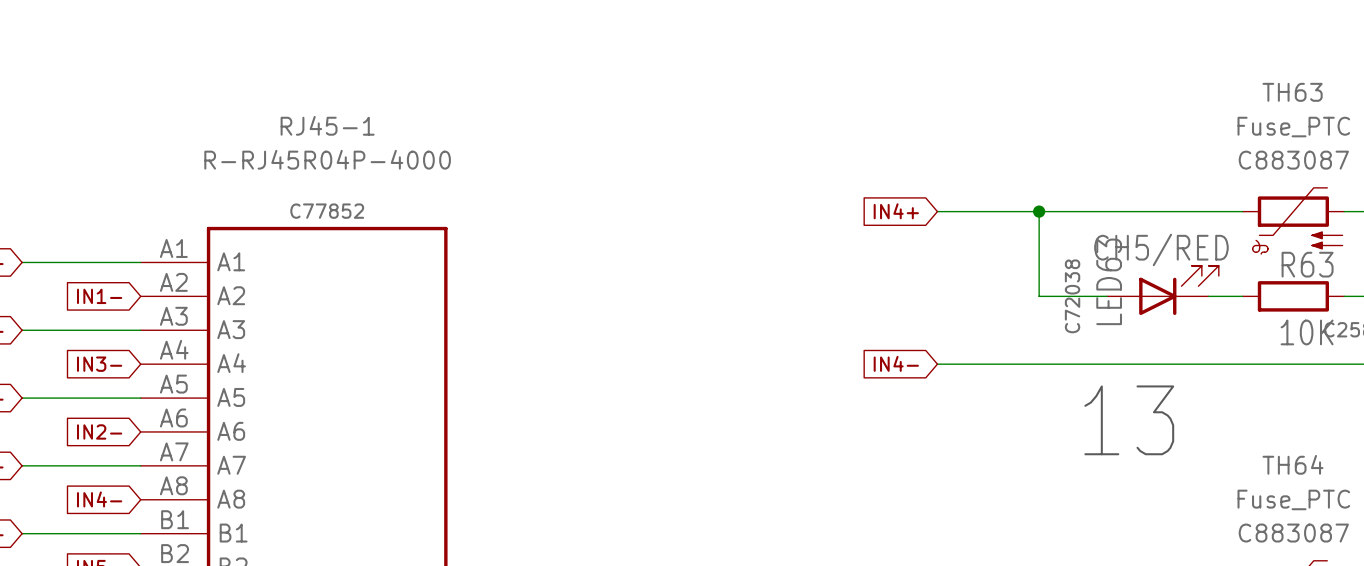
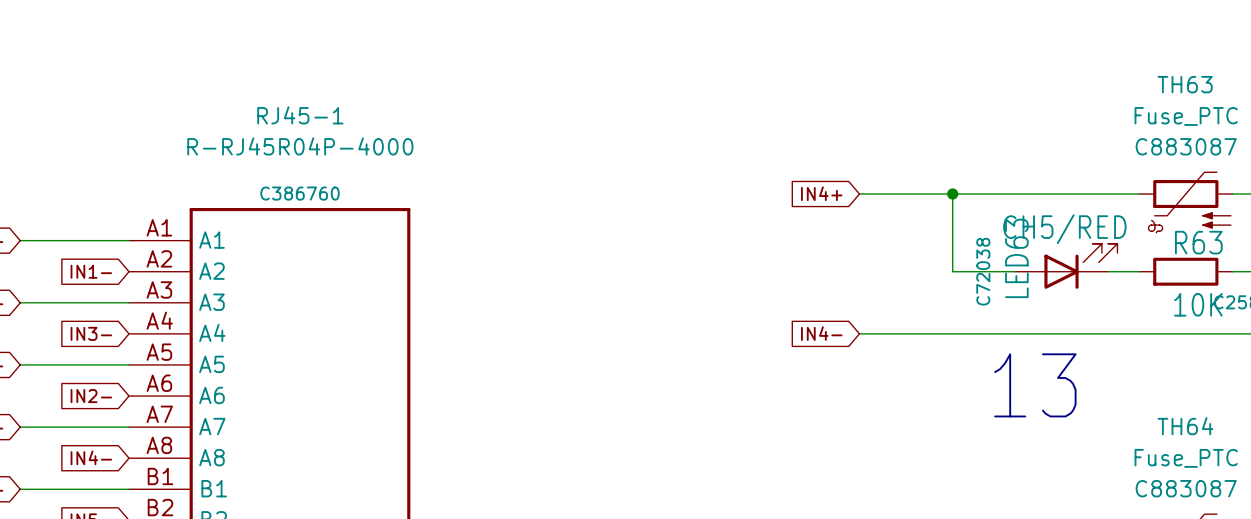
RJ45-1 text: C77852 (327, 211) -> C386760 (299, 193)

